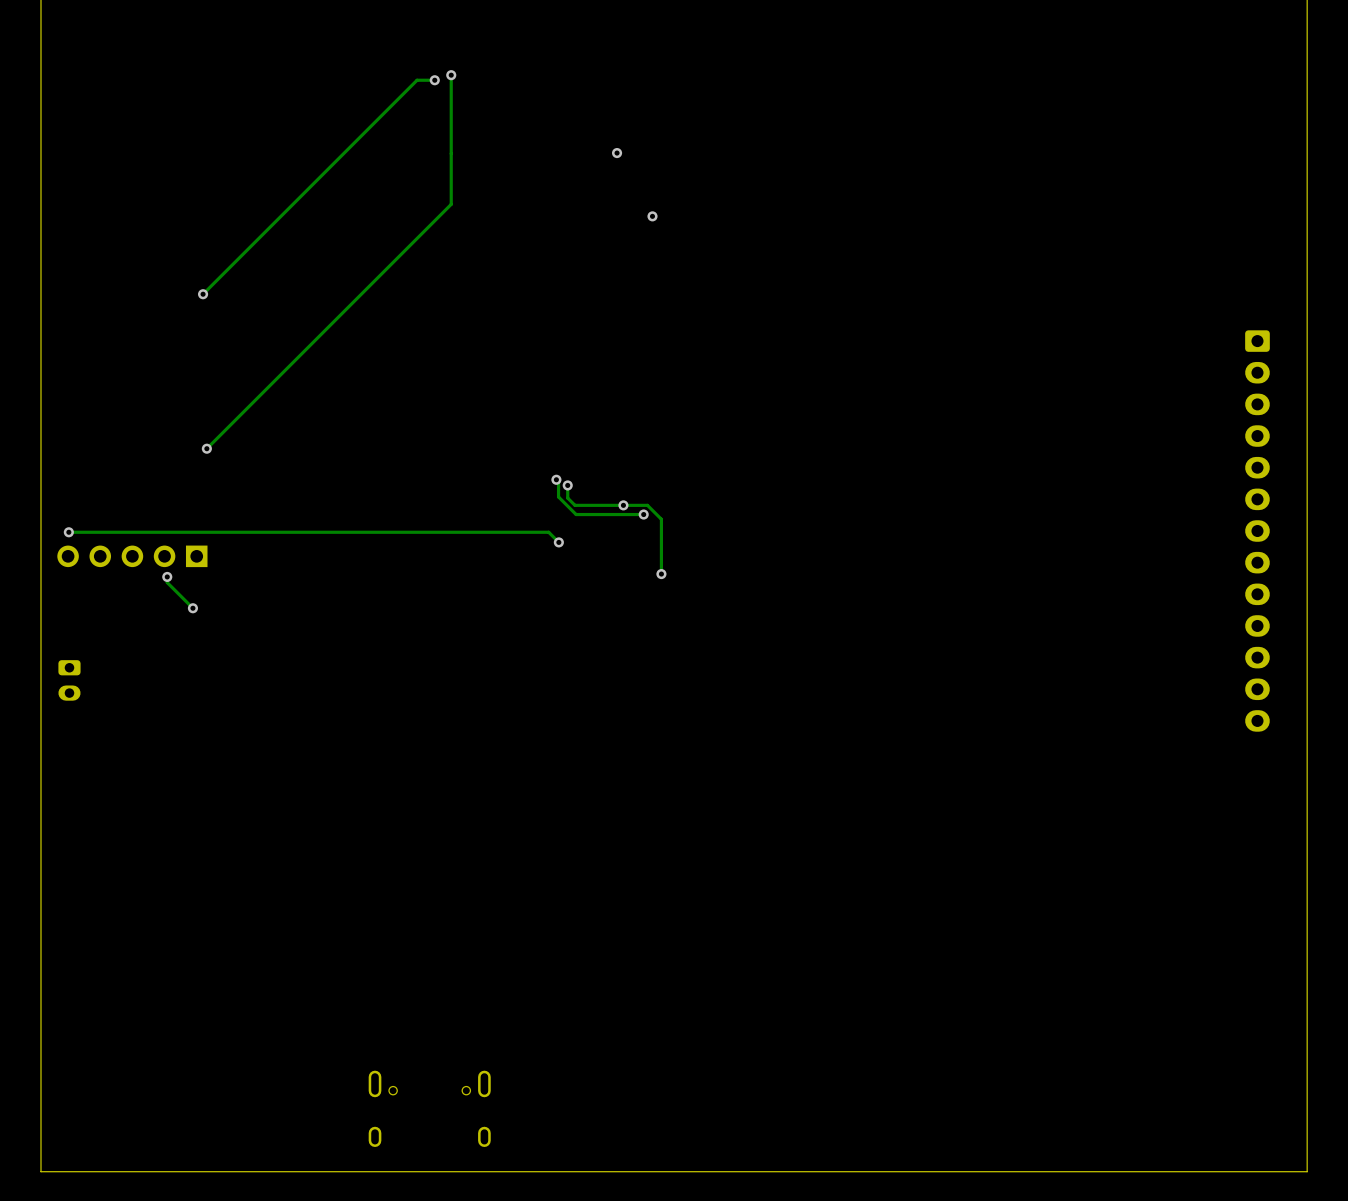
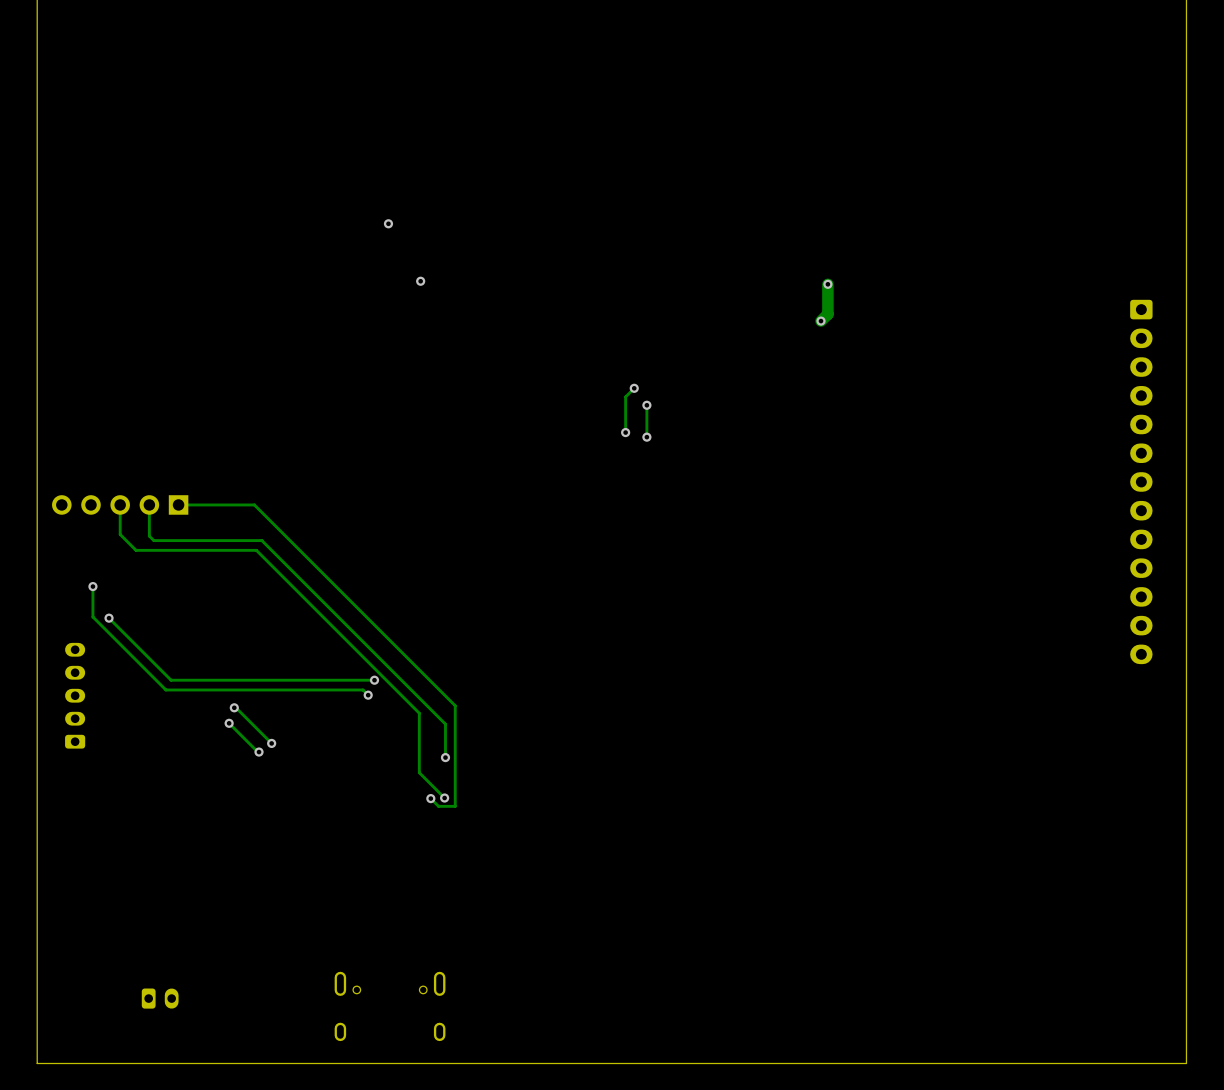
track: (451, 75) (451, 204) (206, 448) -> none
via: (451, 75) -> none
track: (434, 80) (417, 80) (203, 294) -> none
via: (434, 80) -> none
via: (617, 153) -> none
via: (652, 216) -> none
via: none -> (388, 223)
via: (203, 294) -> none
via: none -> (420, 281)
track: none -> (827, 284) (827, 314) (821, 321)
via: none -> (827, 284)
via: none -> (821, 321)
track: none -> (634, 388) (625, 396) (625, 432)
via: none -> (634, 388)
track: none -> (646, 405) (646, 437)
via: none -> (646, 405)
via: (206, 448) -> none
via: none -> (625, 432)
track: (556, 479) (558, 481) (558, 496) (576, 514) (643, 514) -> none
via: (556, 479) -> none
via: none -> (646, 437)
track: (567, 485) (567, 498) (575, 505) (647, 505) (661, 519) (661, 574) -> none
via: (567, 485) -> none
via: (623, 505) -> none
via: (643, 514) -> none
track: (68, 532) (548, 532) (558, 542) -> none
via: (68, 532) -> none
via: (558, 542) -> none
track: none -> (120, 504) (120, 534) (136, 550) (256, 550) (419, 713) (419, 772) (444, 798)
track: none -> (149, 504) (149, 536) (153, 540) (261, 540) (445, 724) (445, 757)
track: none -> (178, 504) (254, 504) (455, 705) (455, 806) (438, 806) (430, 798)
via: (661, 574) -> none
track: (167, 576) (167, 582) (192, 608) -> none
via: (167, 576) -> none
via: (192, 608) -> none
track: none -> (92, 586) (92, 617) (165, 689) (363, 689) (368, 695)
via: none -> (92, 586)
part: (69, 680) -> none
track: none -> (109, 618) (171, 680) (374, 680)
via: none -> (109, 618)
via: none -> (374, 680)
via: none -> (368, 695)
part: none -> (75, 695)
track: none -> (234, 707) (271, 743)
via: none -> (234, 707)
track: none -> (229, 723) (259, 752)
via: none -> (229, 723)
via: none -> (271, 743)
via: none -> (259, 752)
via: none -> (445, 757)
via: none -> (430, 798)
via: none -> (444, 798)
part: none -> (160, 998)

